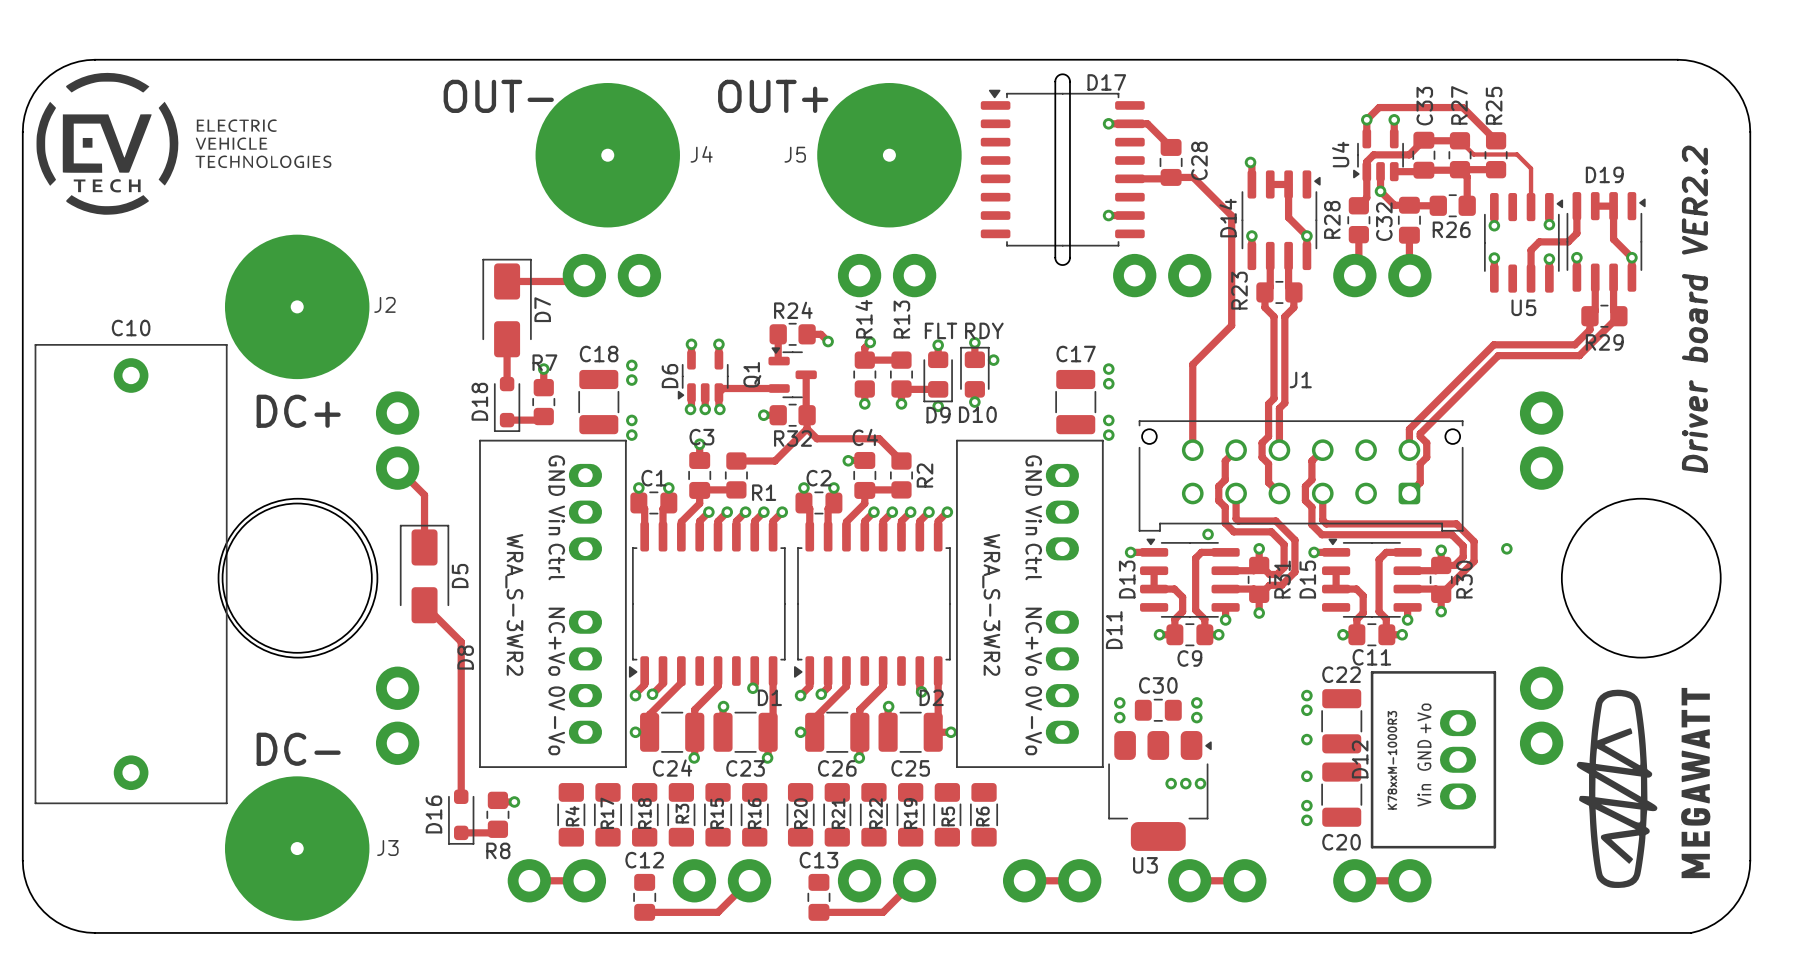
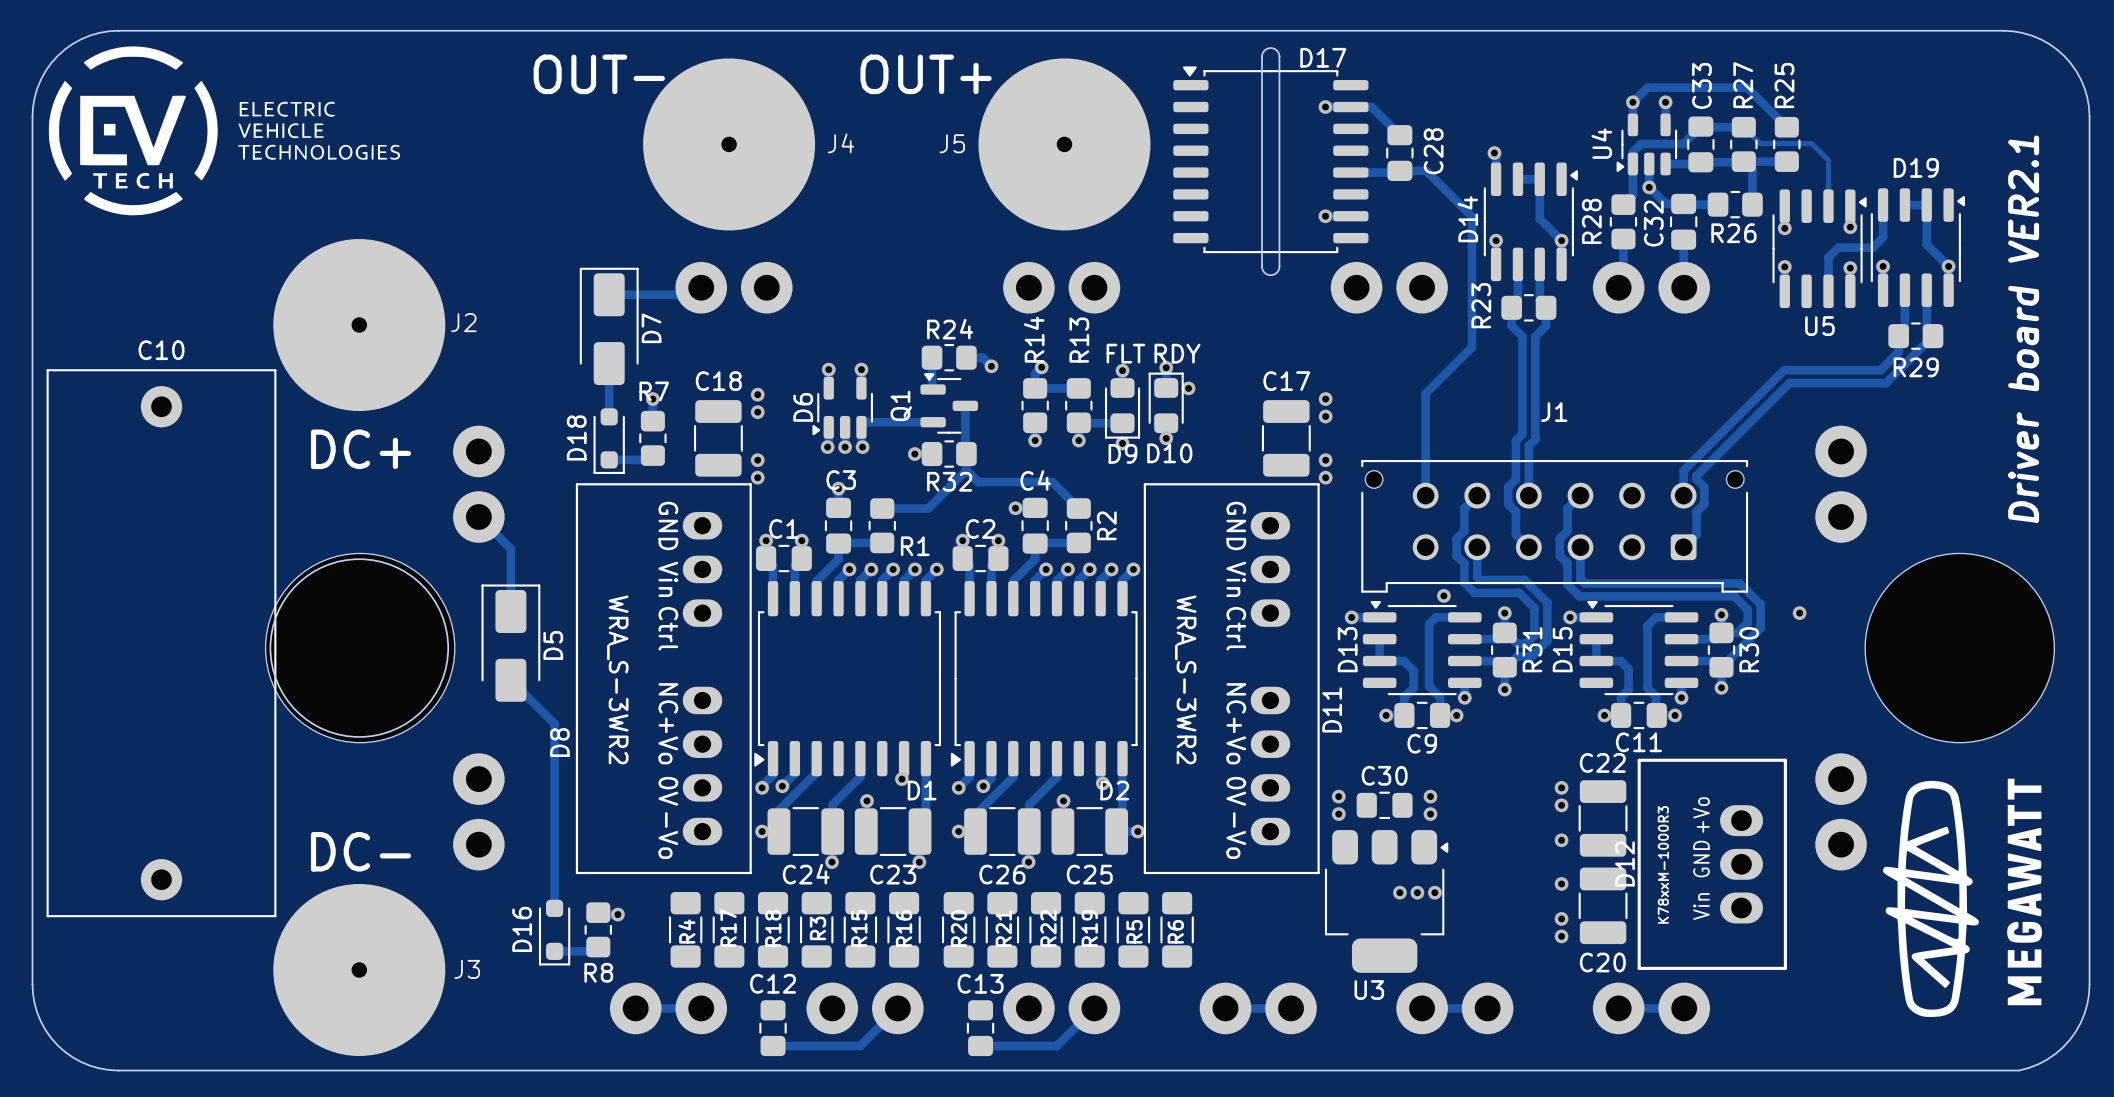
text: Driver board VER2.2 (1694, 309) -> Driver board VER2.1 (2023, 329)

